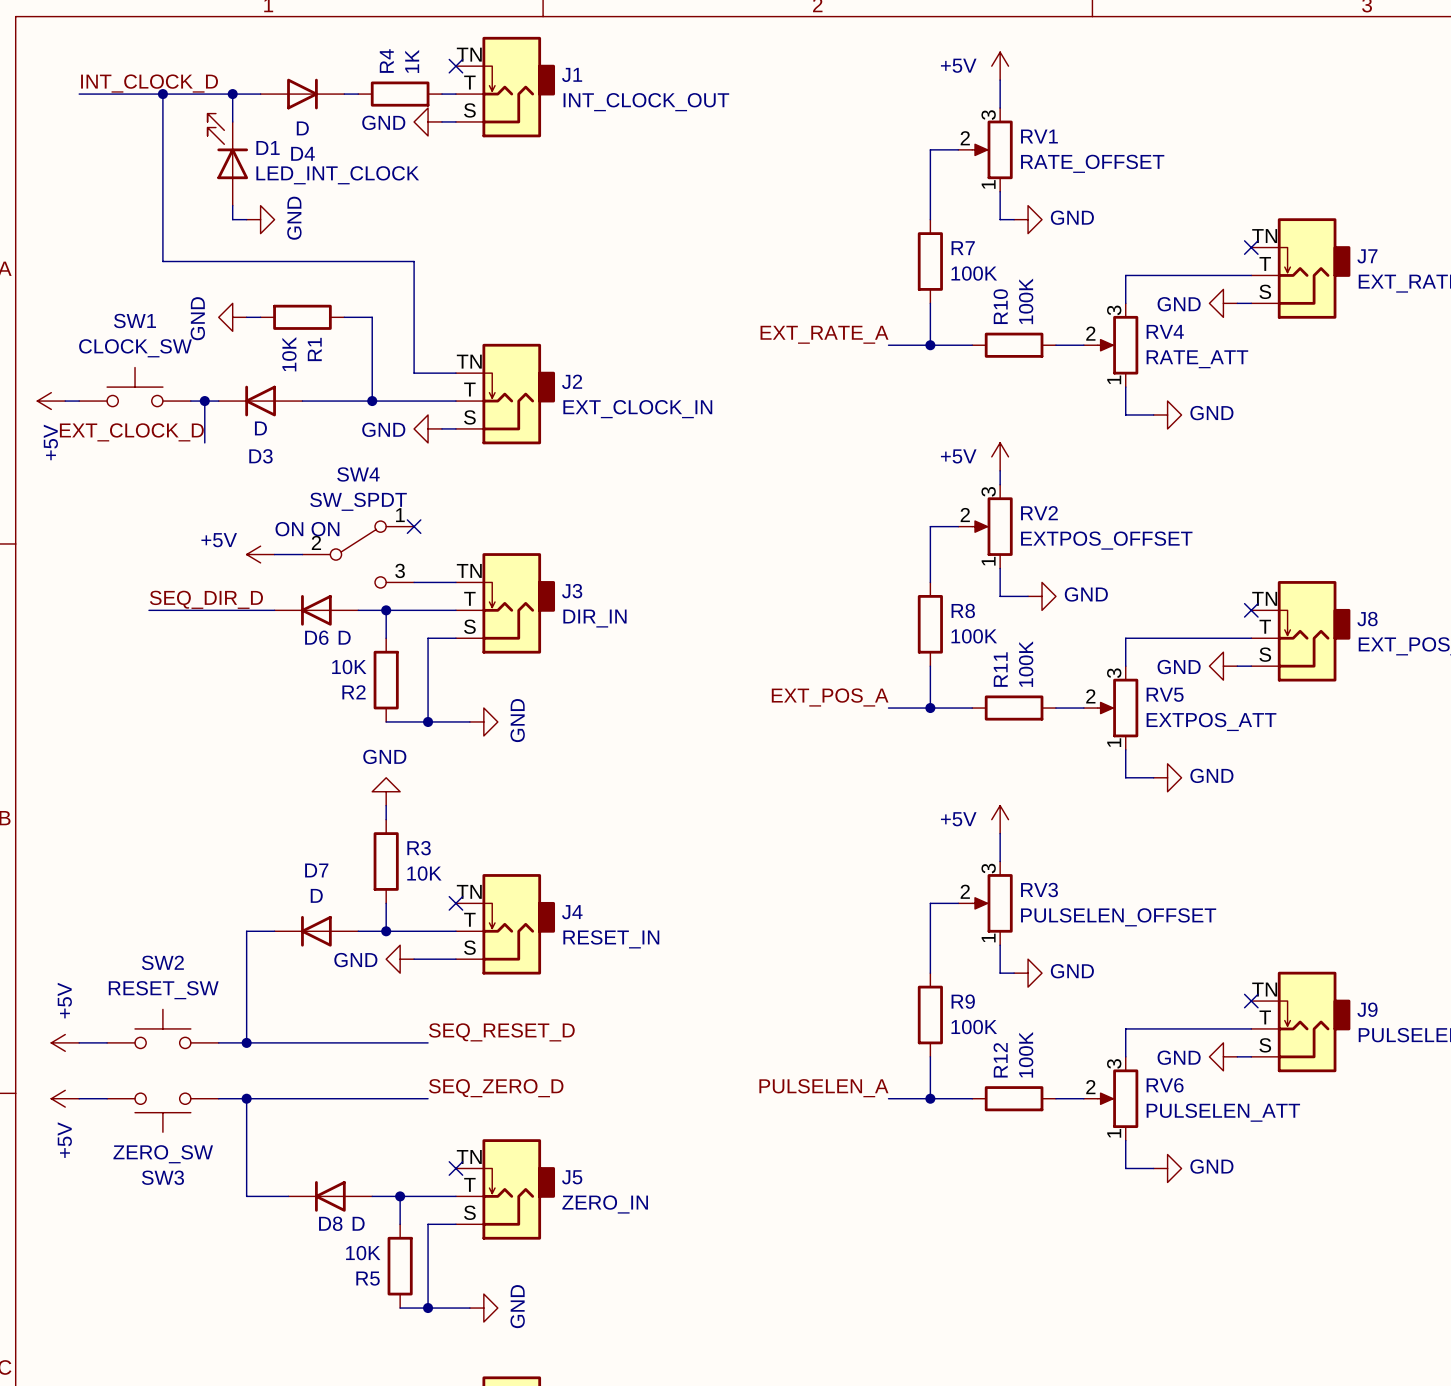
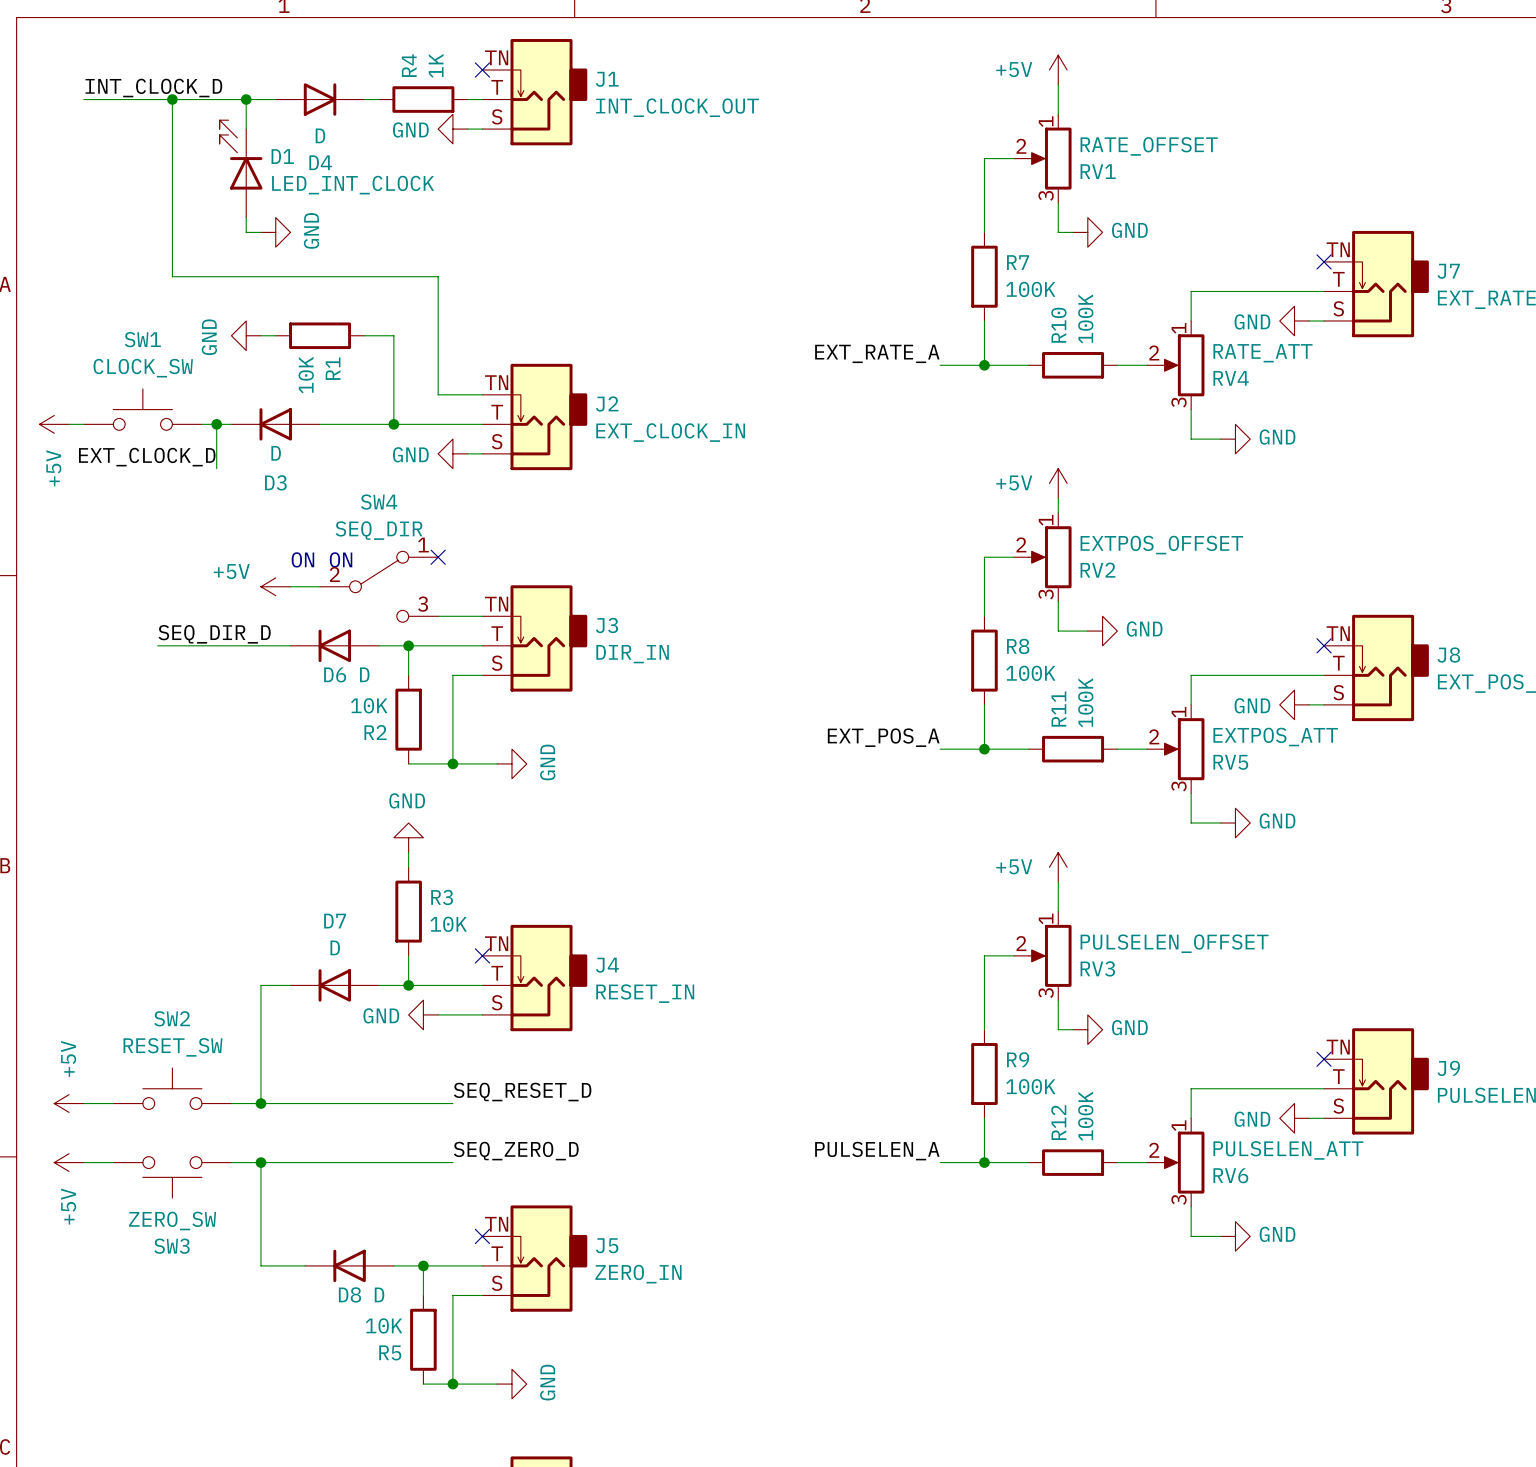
RV1 flip: as is (992, 149) -> up-down (1050, 158)
RV4 flip: as is (1118, 345) -> up-down (1183, 365)
SW4 value: SW_SPDT (358, 501) -> SEQ_DIR (379, 530)
RV2 flip: as is (992, 526) -> up-down (1050, 557)
RV5 flip: as is (1118, 708) -> up-down (1183, 749)
RV3 flip: as is (992, 903) -> up-down (1050, 955)
RV6 flip: as is (1118, 1098) -> up-down (1183, 1162)

